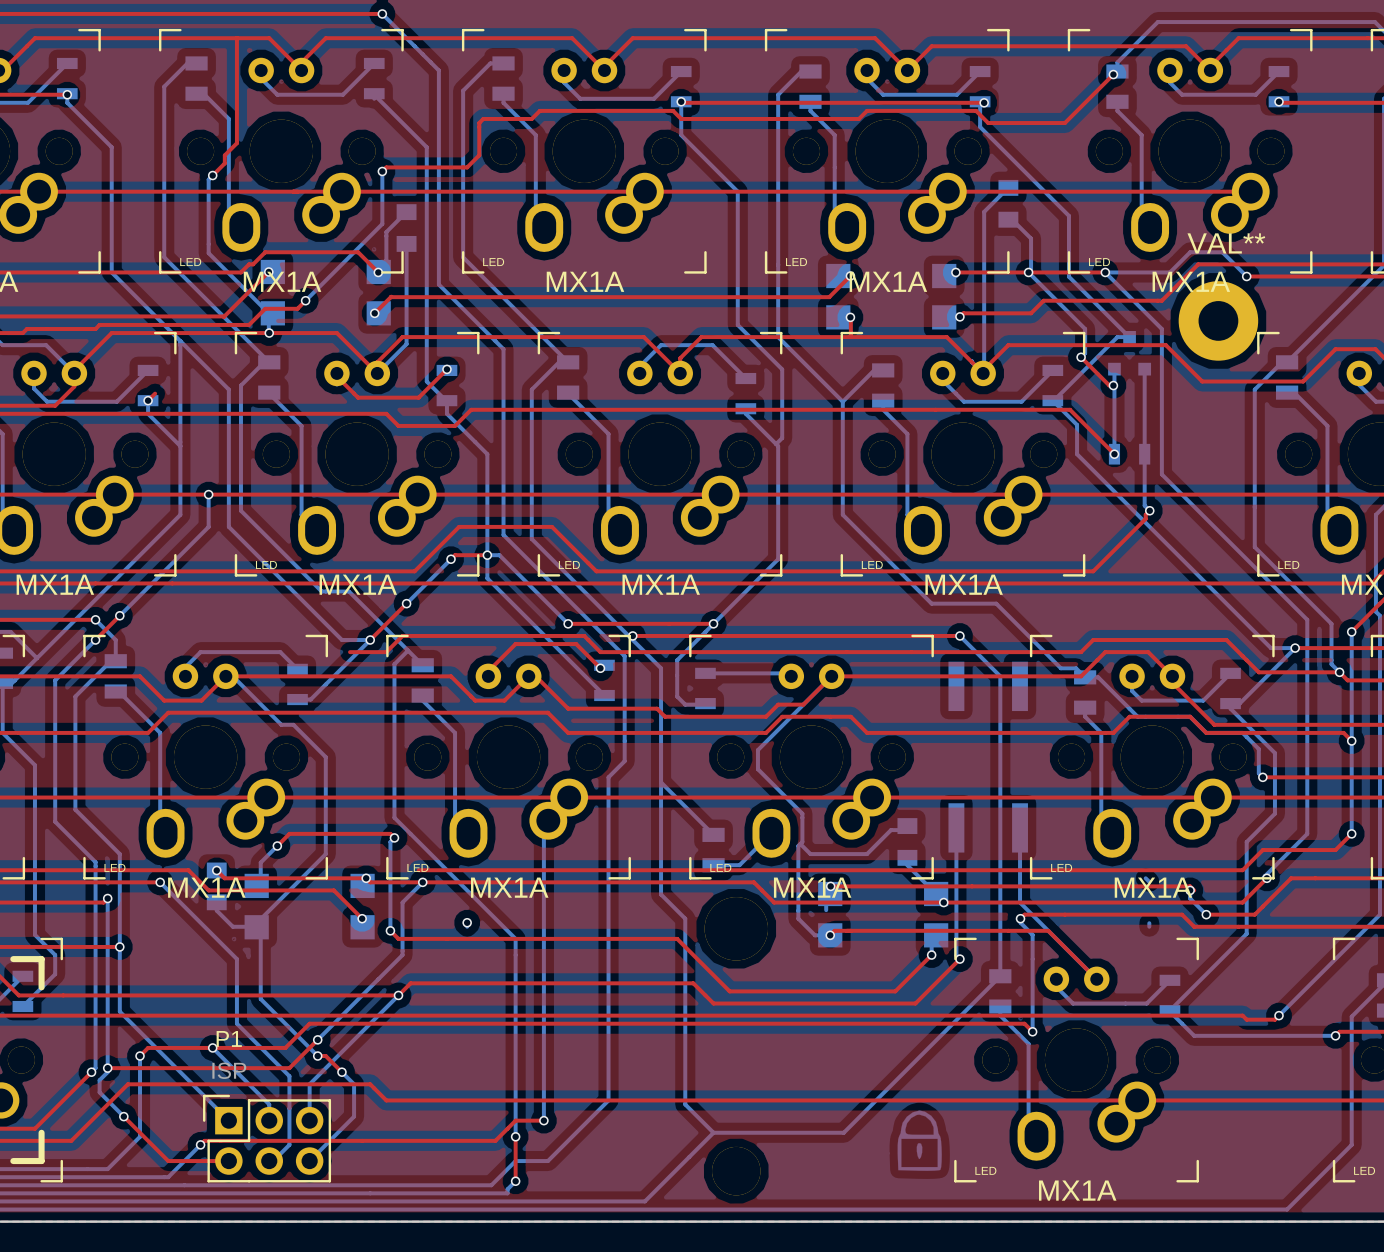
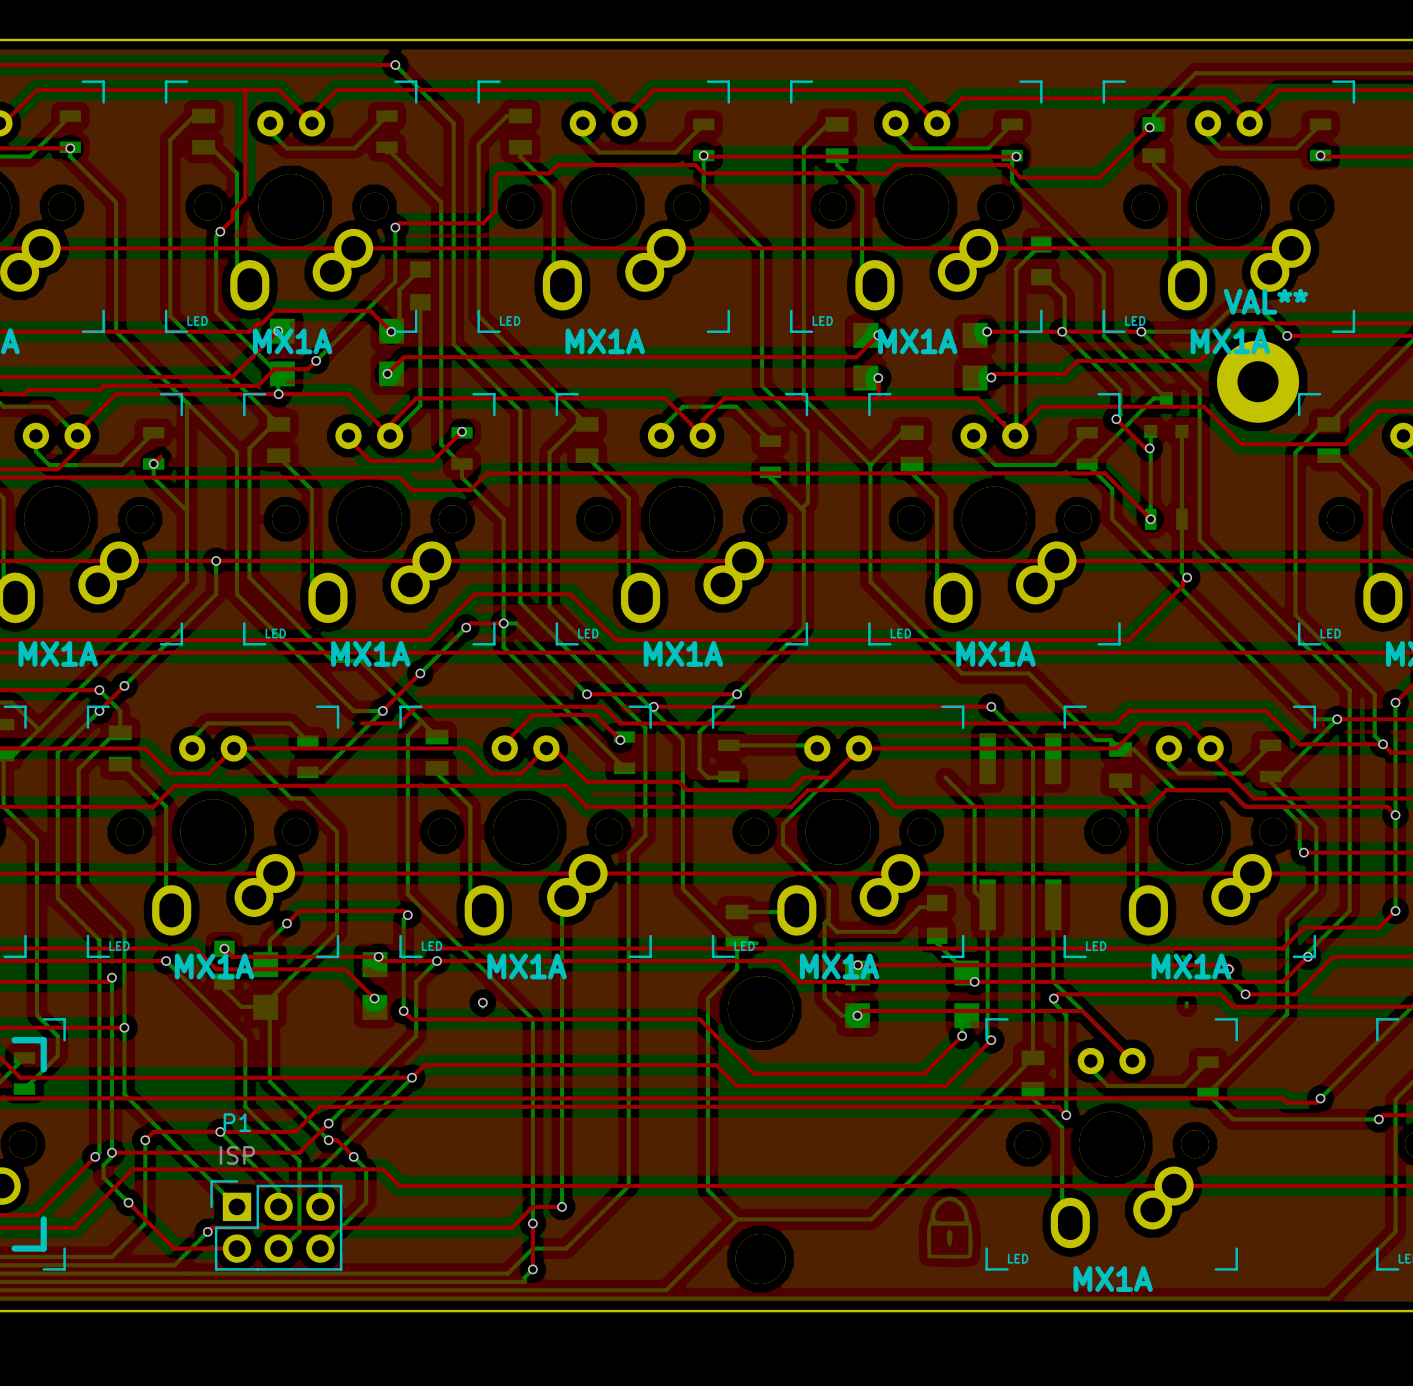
bottom track: none -> (945, 777) (974, 806) (974, 891) (987, 904)
bottom track: (661, 782) (713, 834) -> none
bottom track: (661, 812) (661, 894) (685, 918) -> (682, 889) (737, 943) (737, 969) (707, 998)
bottom track: (769, 834) (739, 865) (732, 865) -> (795, 912) (737, 912)

